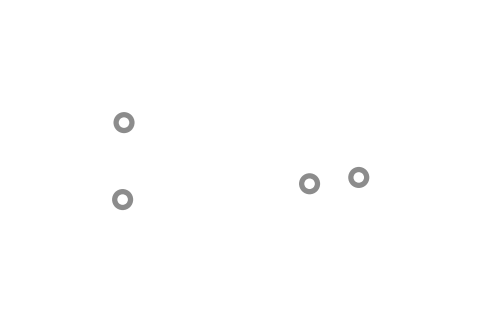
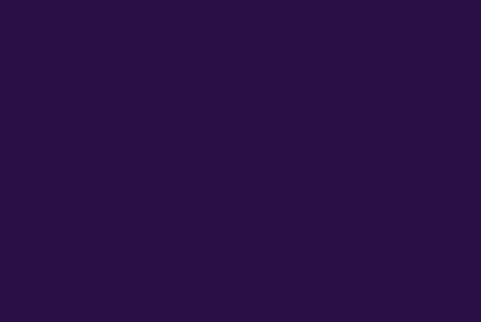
via: (124, 122) -> none
via: (358, 177) -> none
via: (309, 183) -> none
via: (122, 199) -> none

